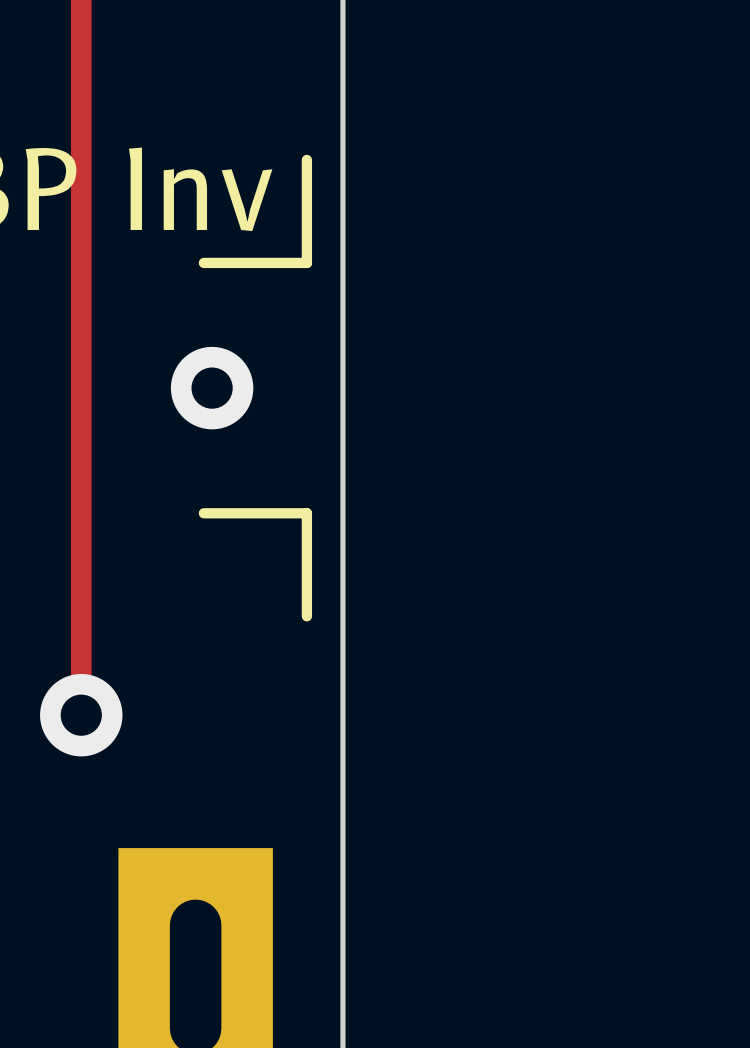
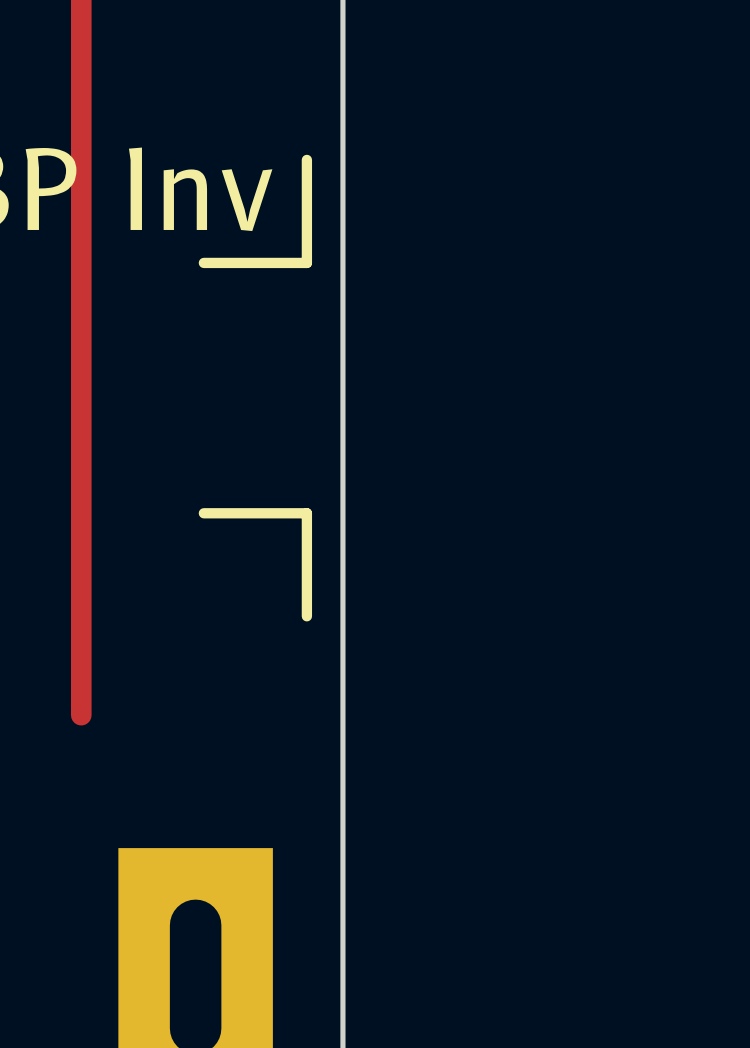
via: (212, 388) -> none
via: (81, 715) -> none

